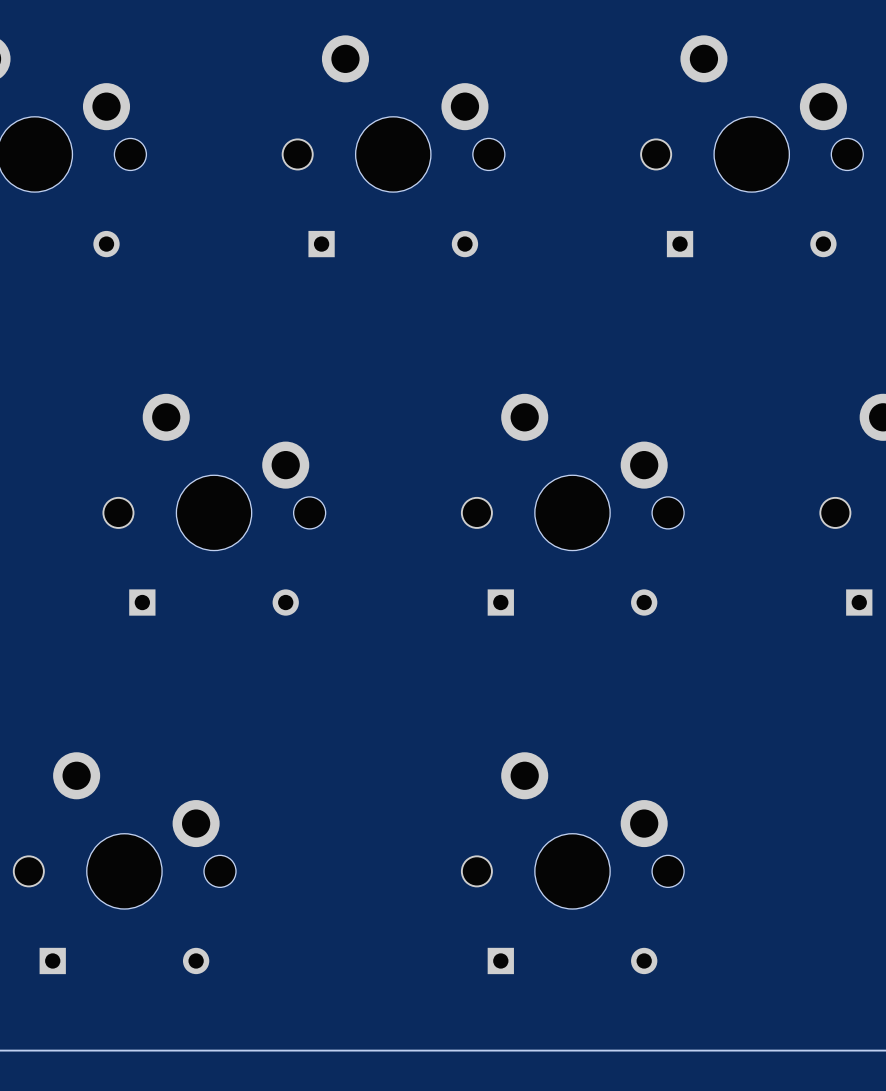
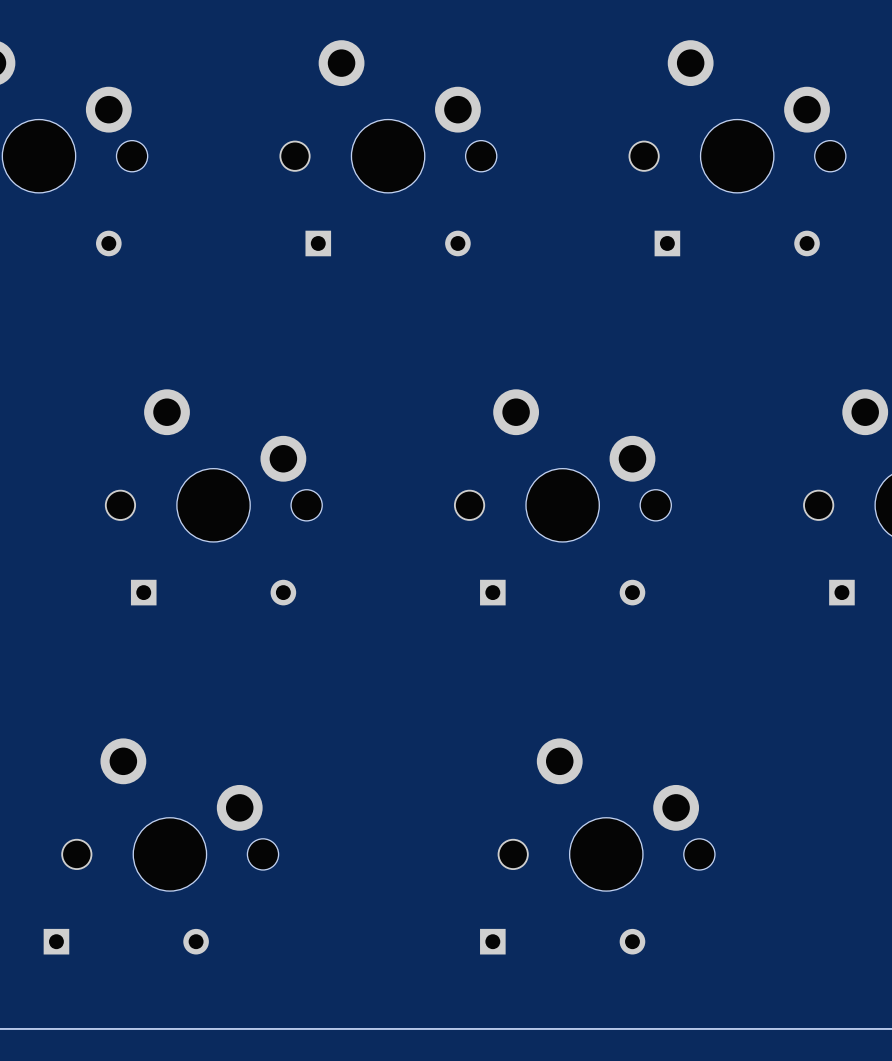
part position: (124, 830) -> (169, 814)
part position: (572, 830) -> (606, 814)

